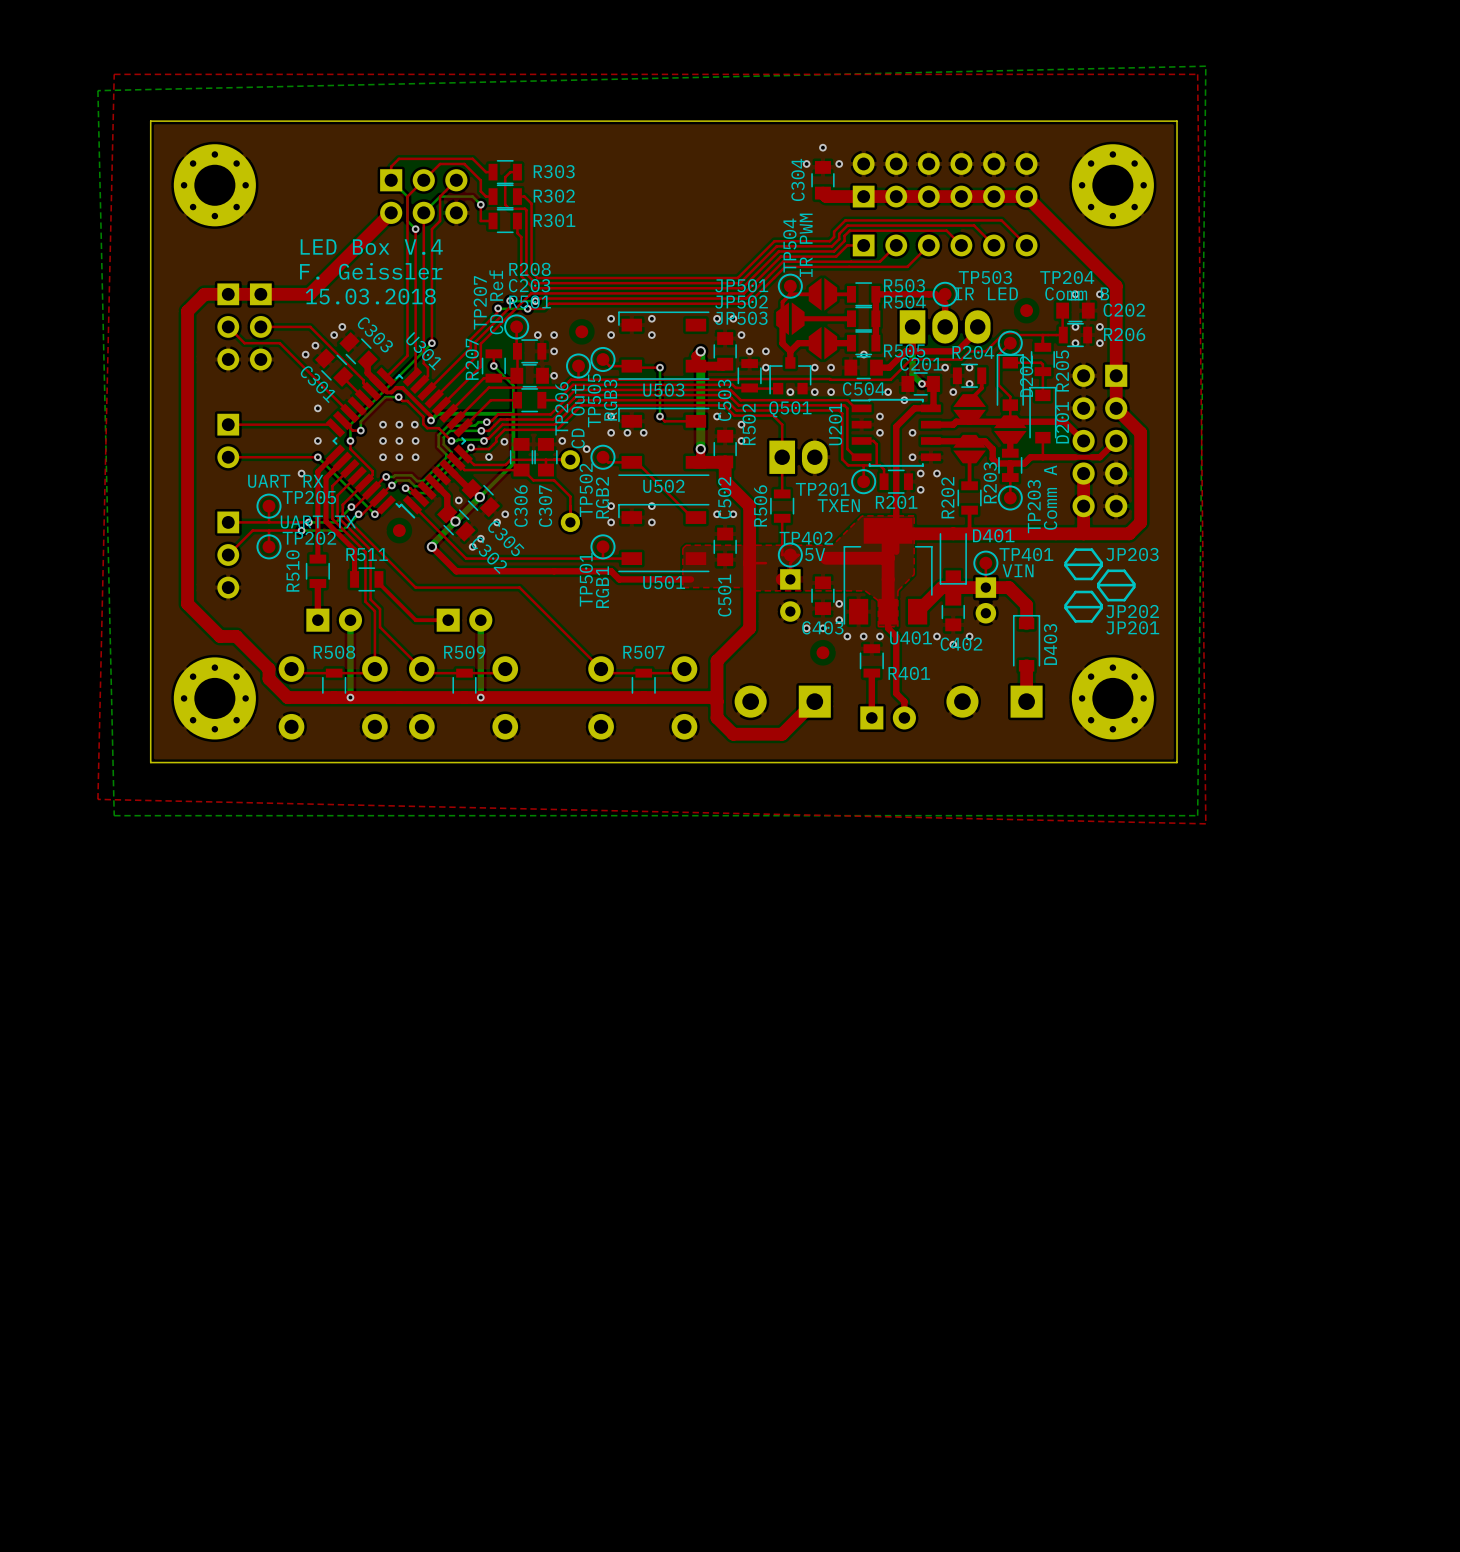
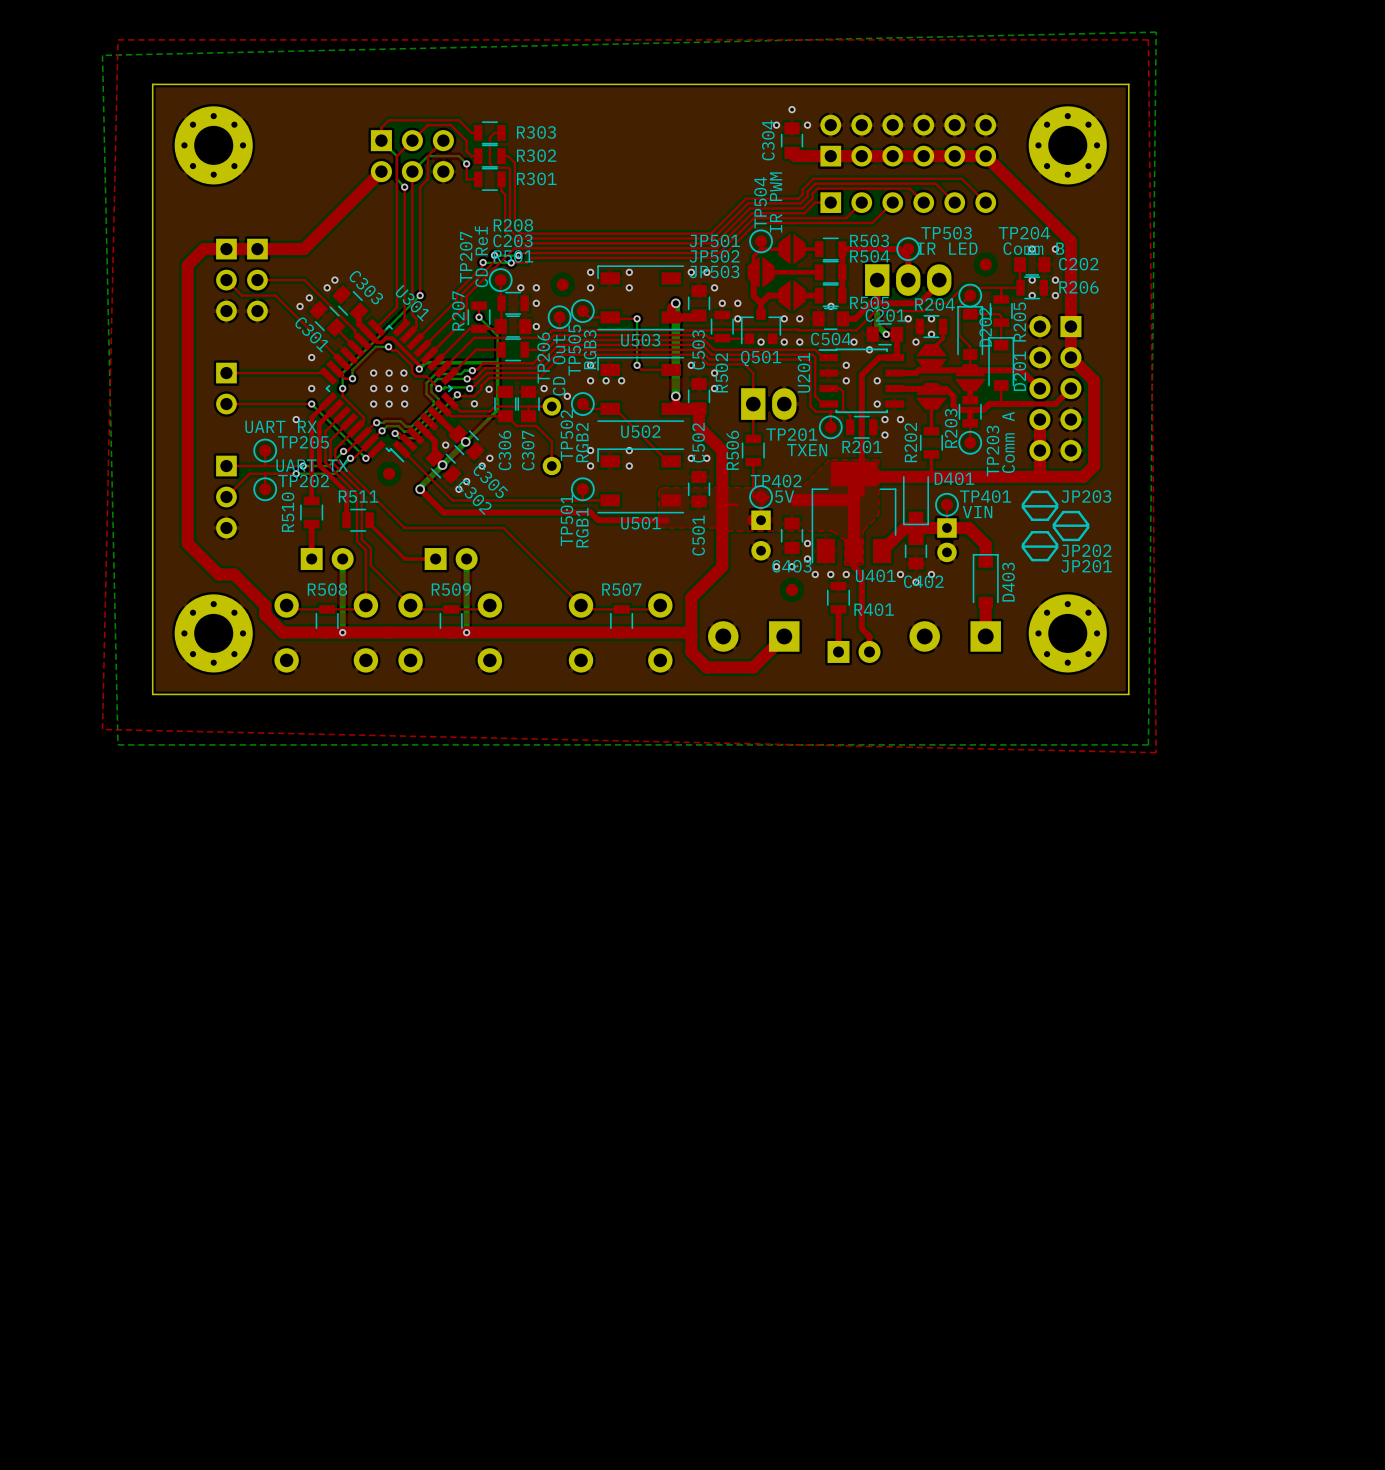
text: LED Box V.4 (371, 247) -> none
text: F. Geissler (371, 271) -> none
text: 15.03.2018 (370, 296) -> none

